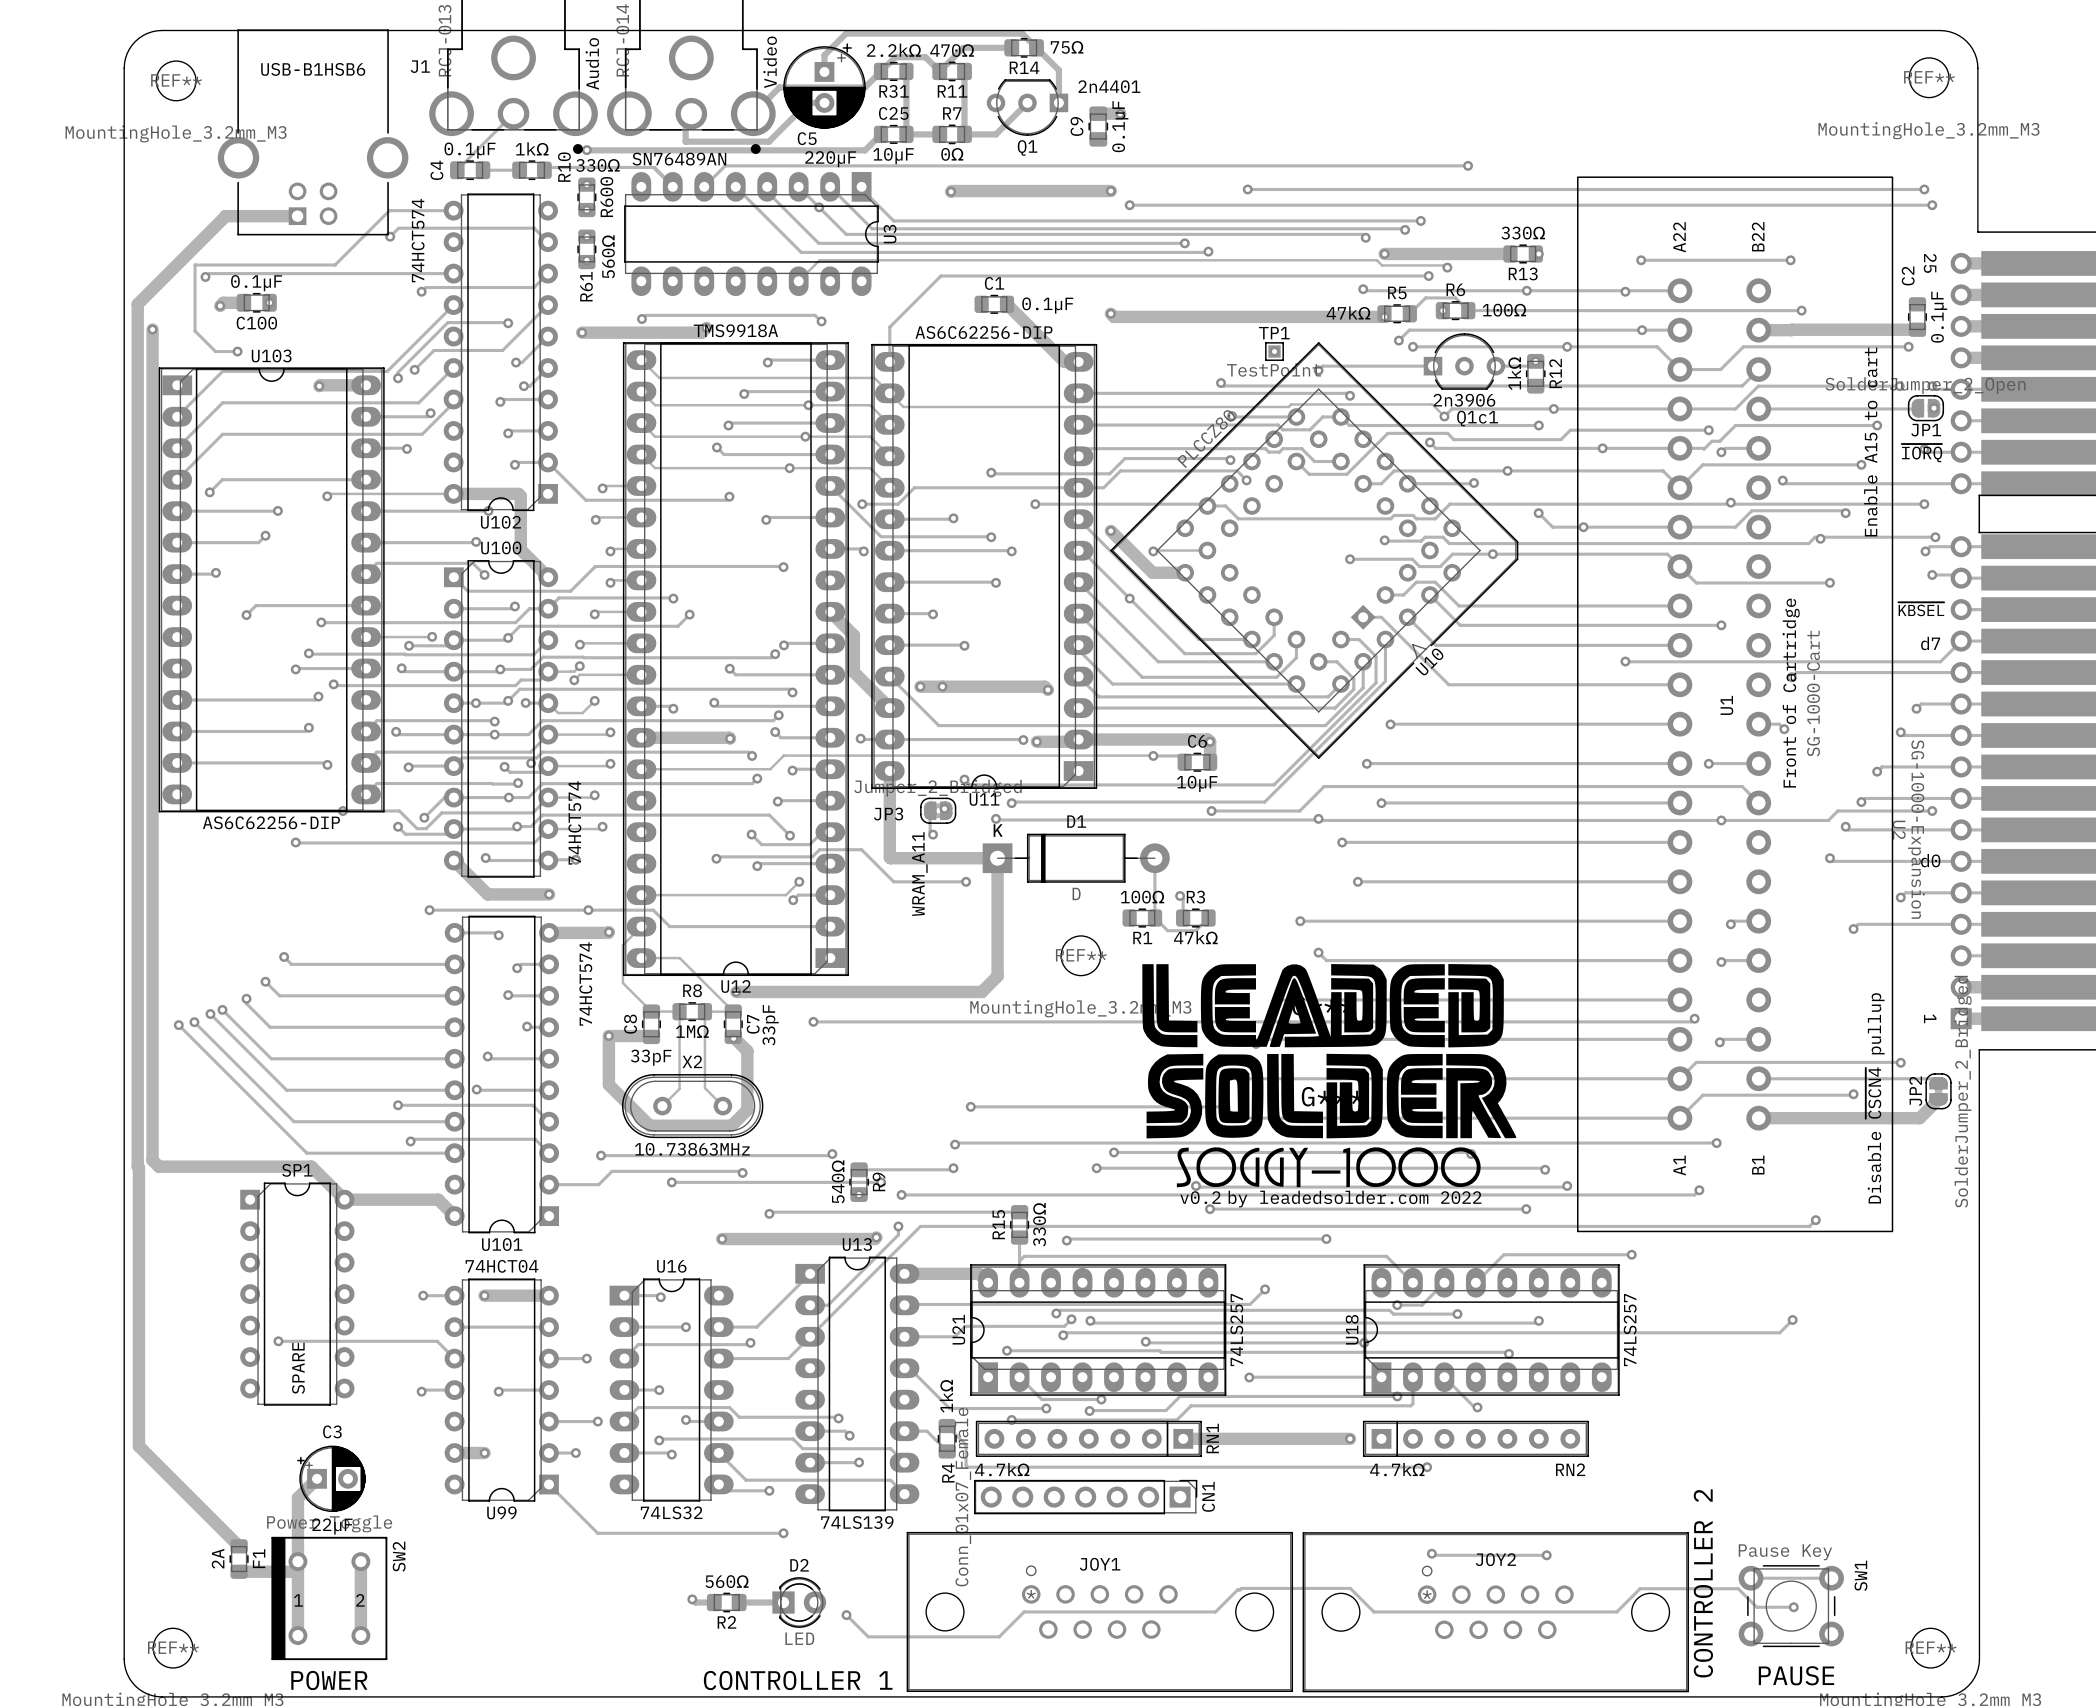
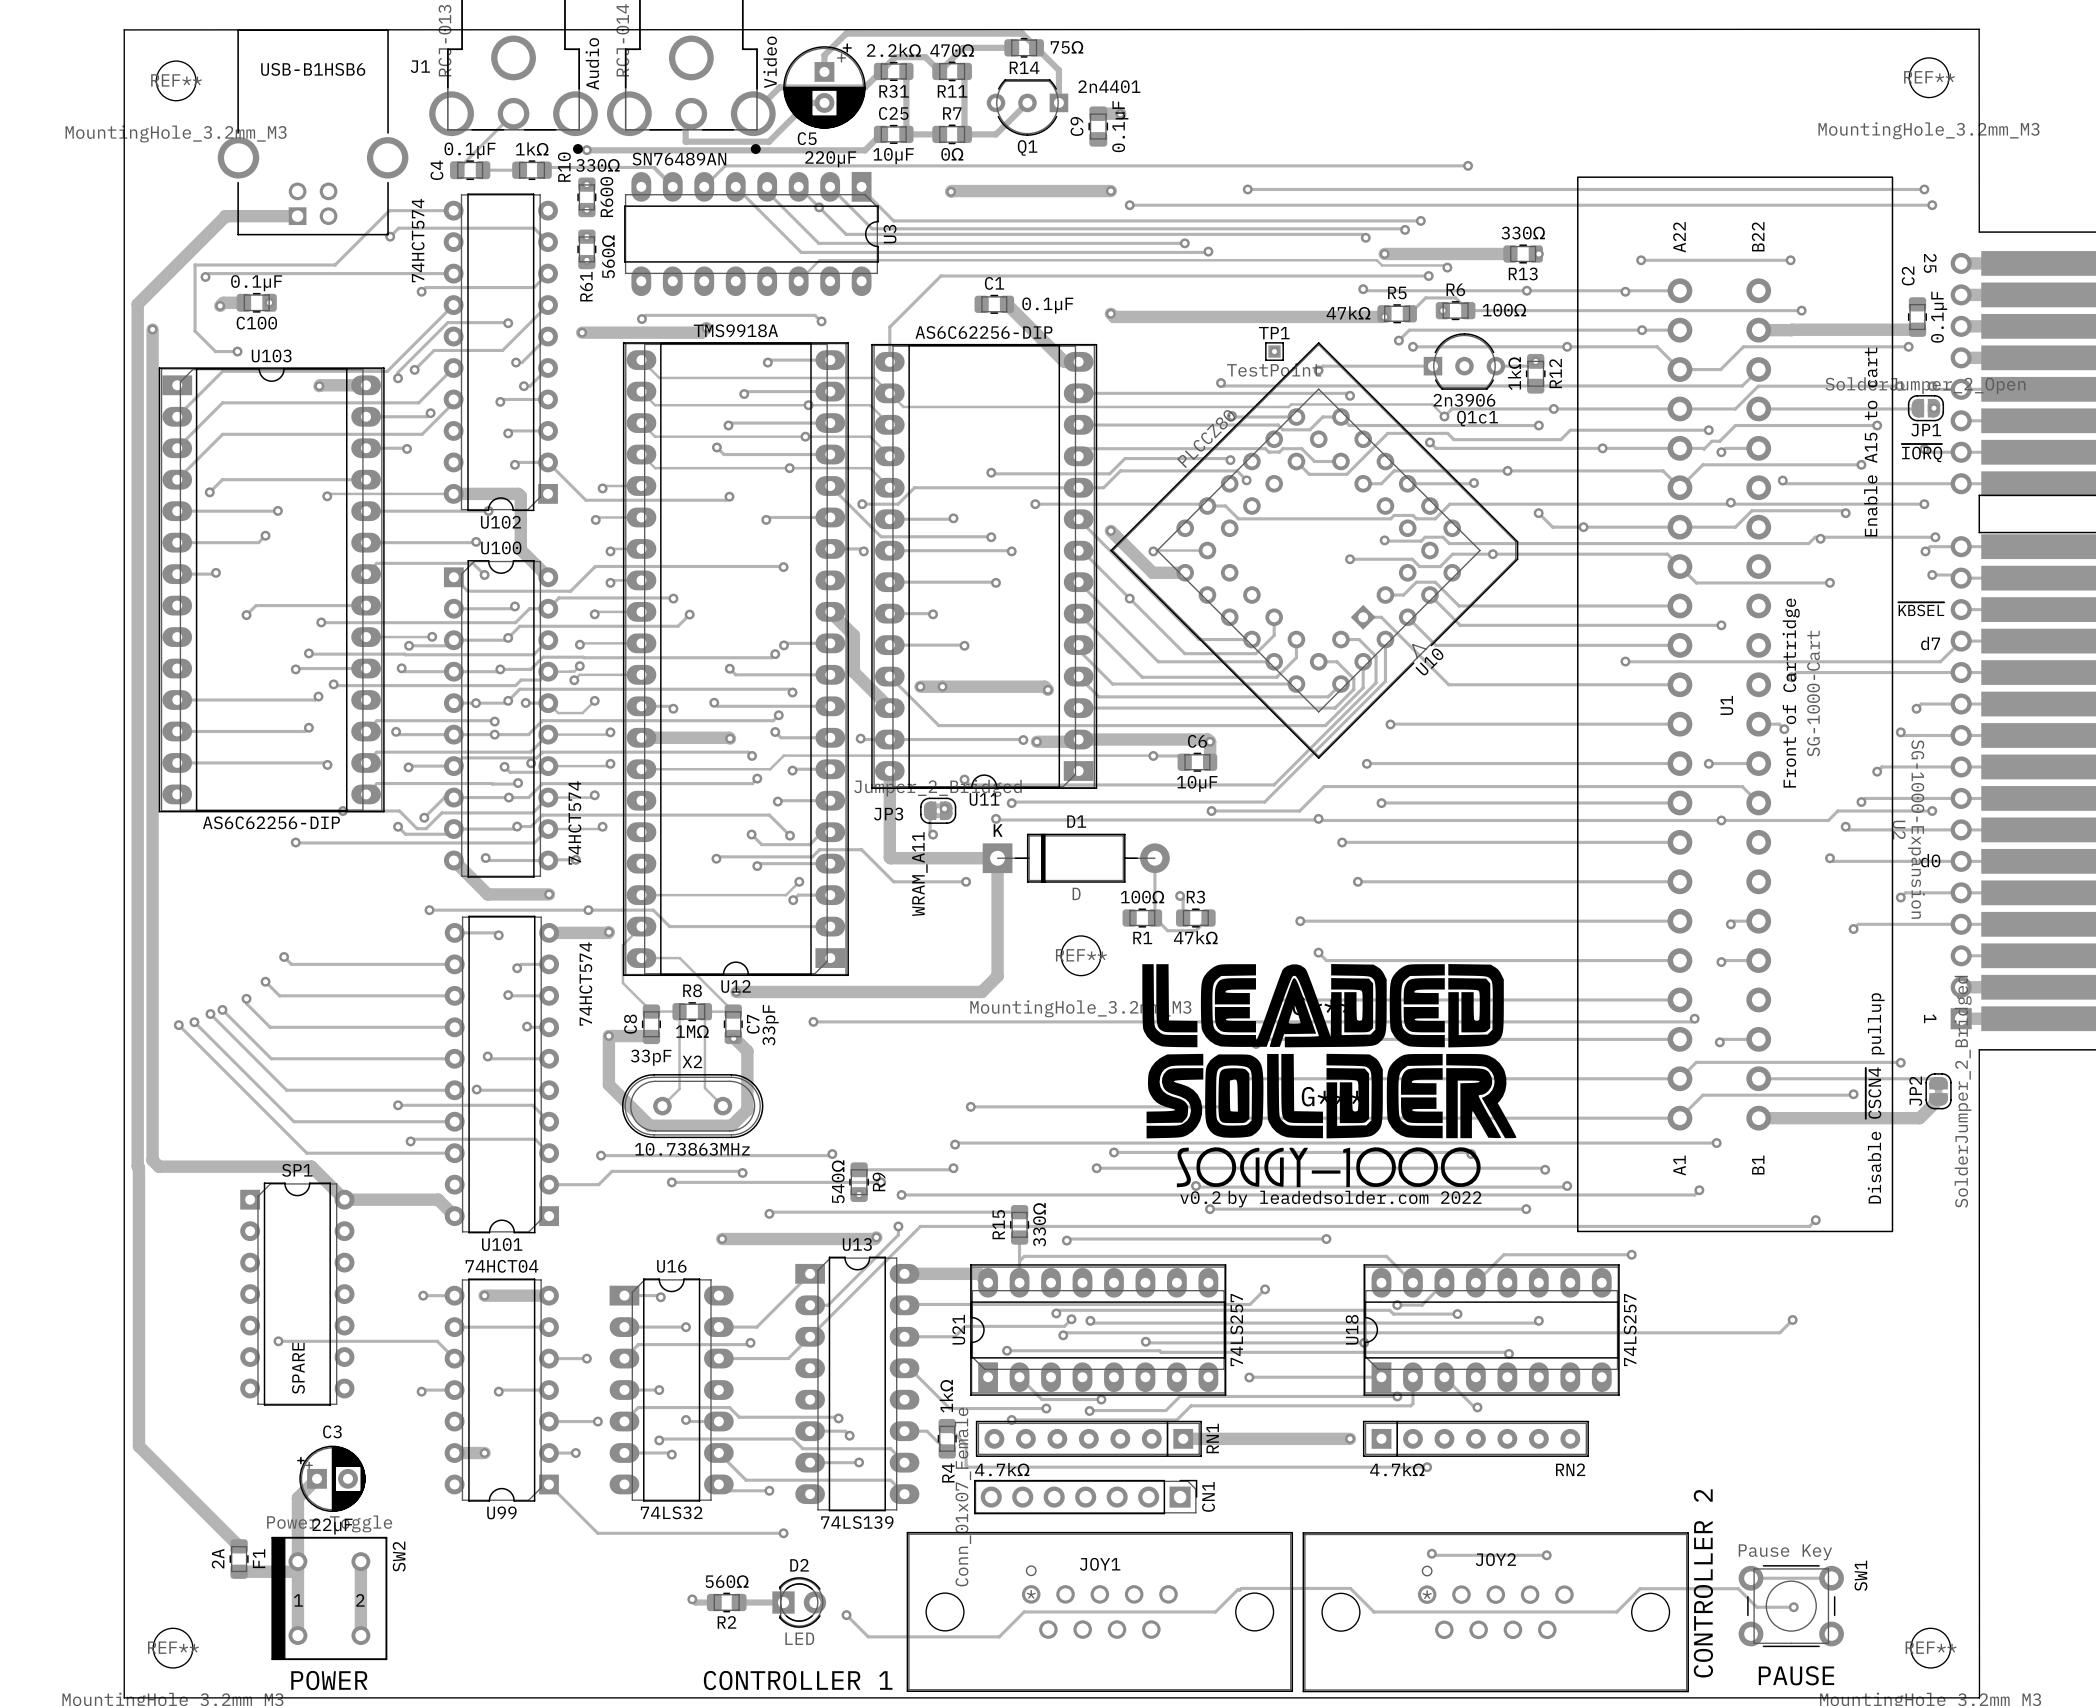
board edge: (1979, 232) (1977, 63) (1975, 53) (1966, 41) (1959, 35) (1945, 30) (161, 30) (152, 31) (138, 38) (129, 49) (124, 68) (125, 1668) (132, 1682) (138, 1689) (147, 1694) (161, 1696) (1951, 1695) (1964, 1689) (1971, 1682) (1978, 1668) (1979, 1659) (1979, 1049) -> (1979, 232) (1979, 29) (124, 29) (124, 1697) (1979, 1697) (1979, 1049)

